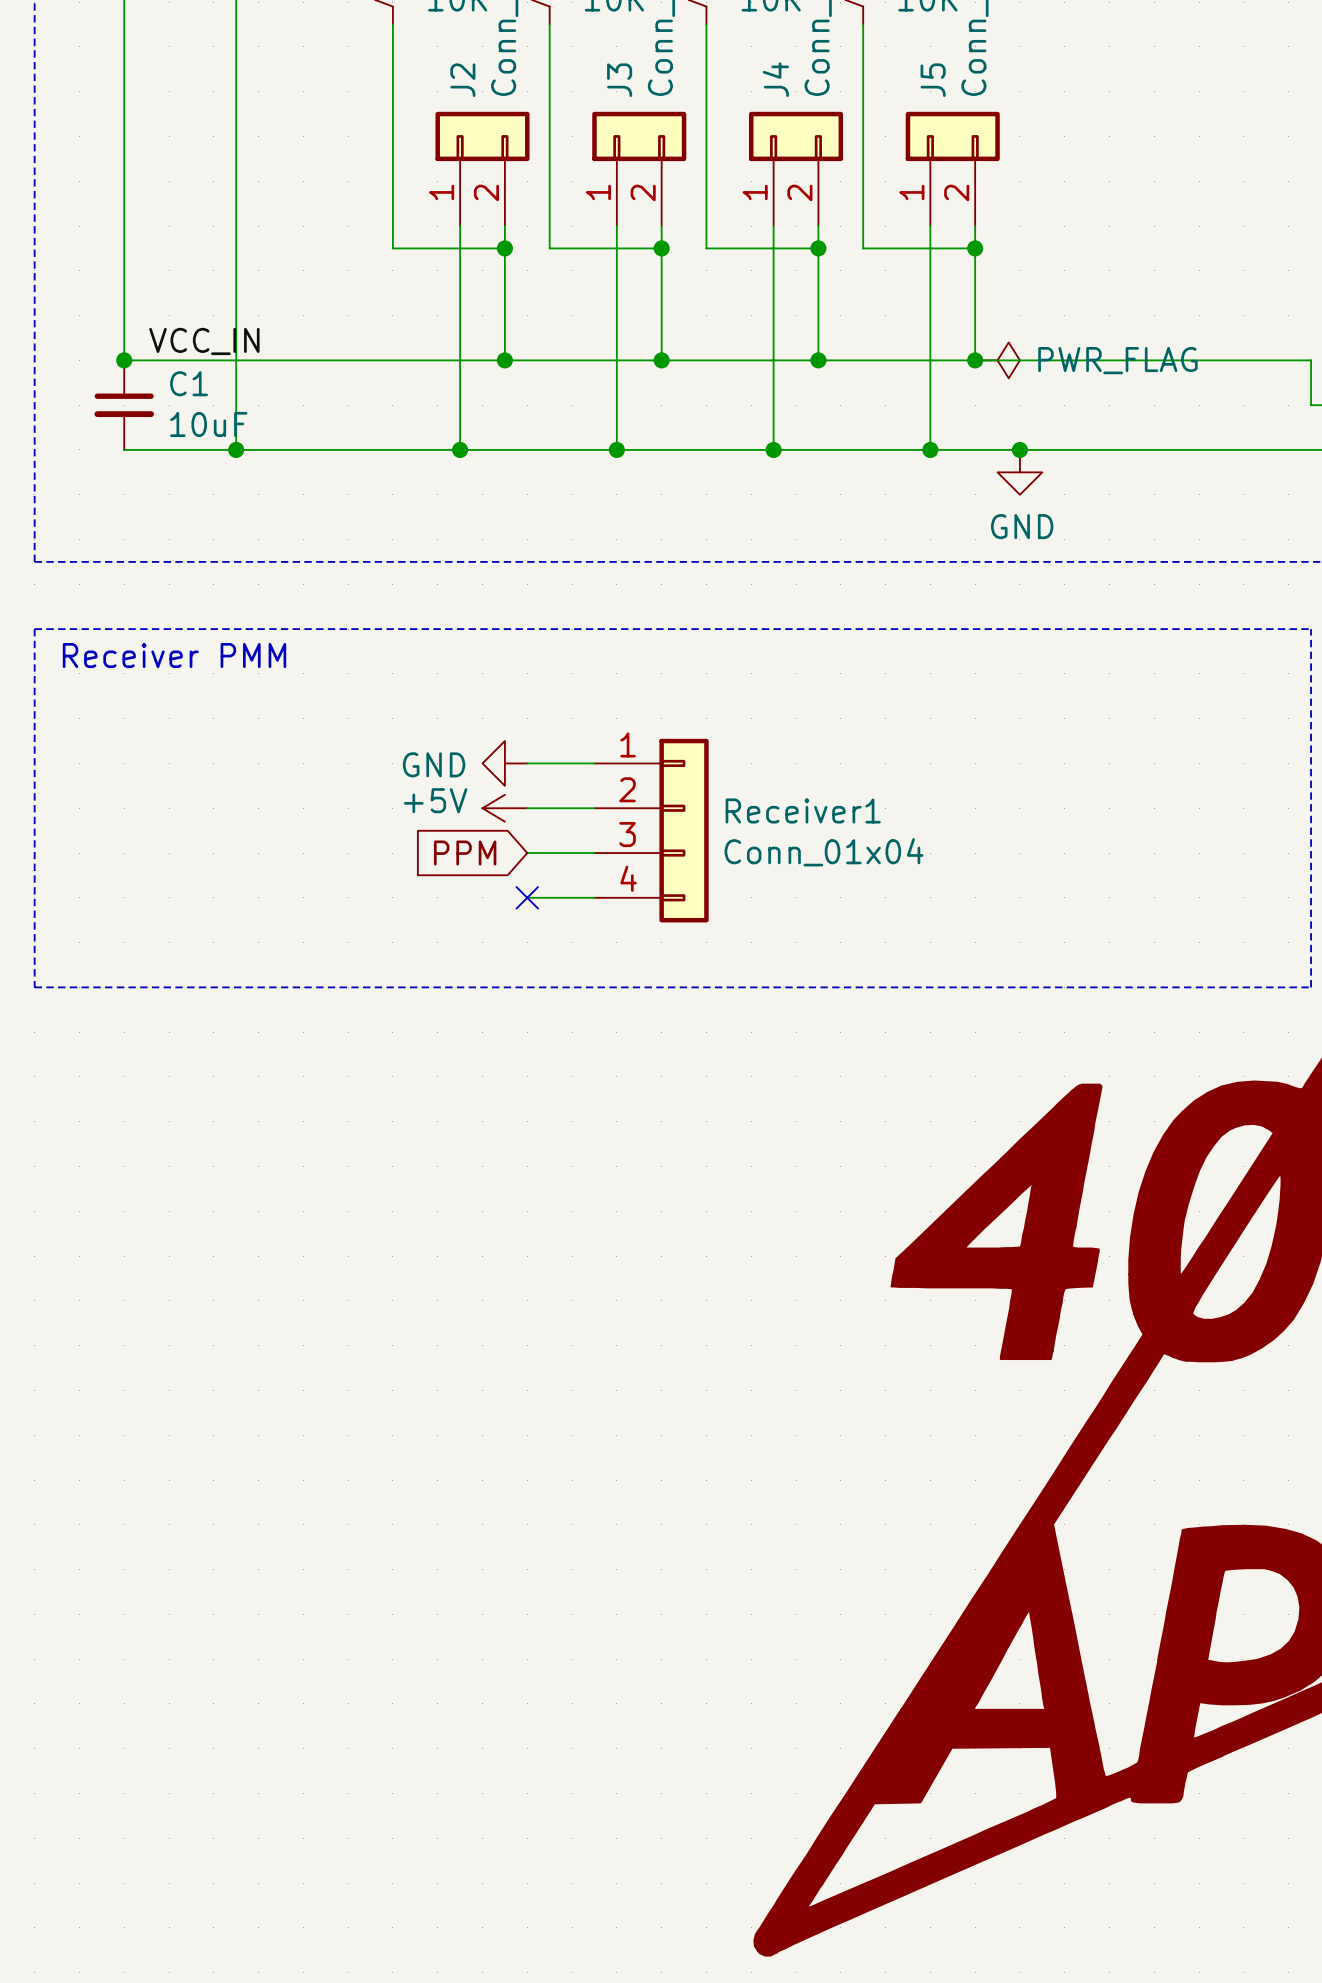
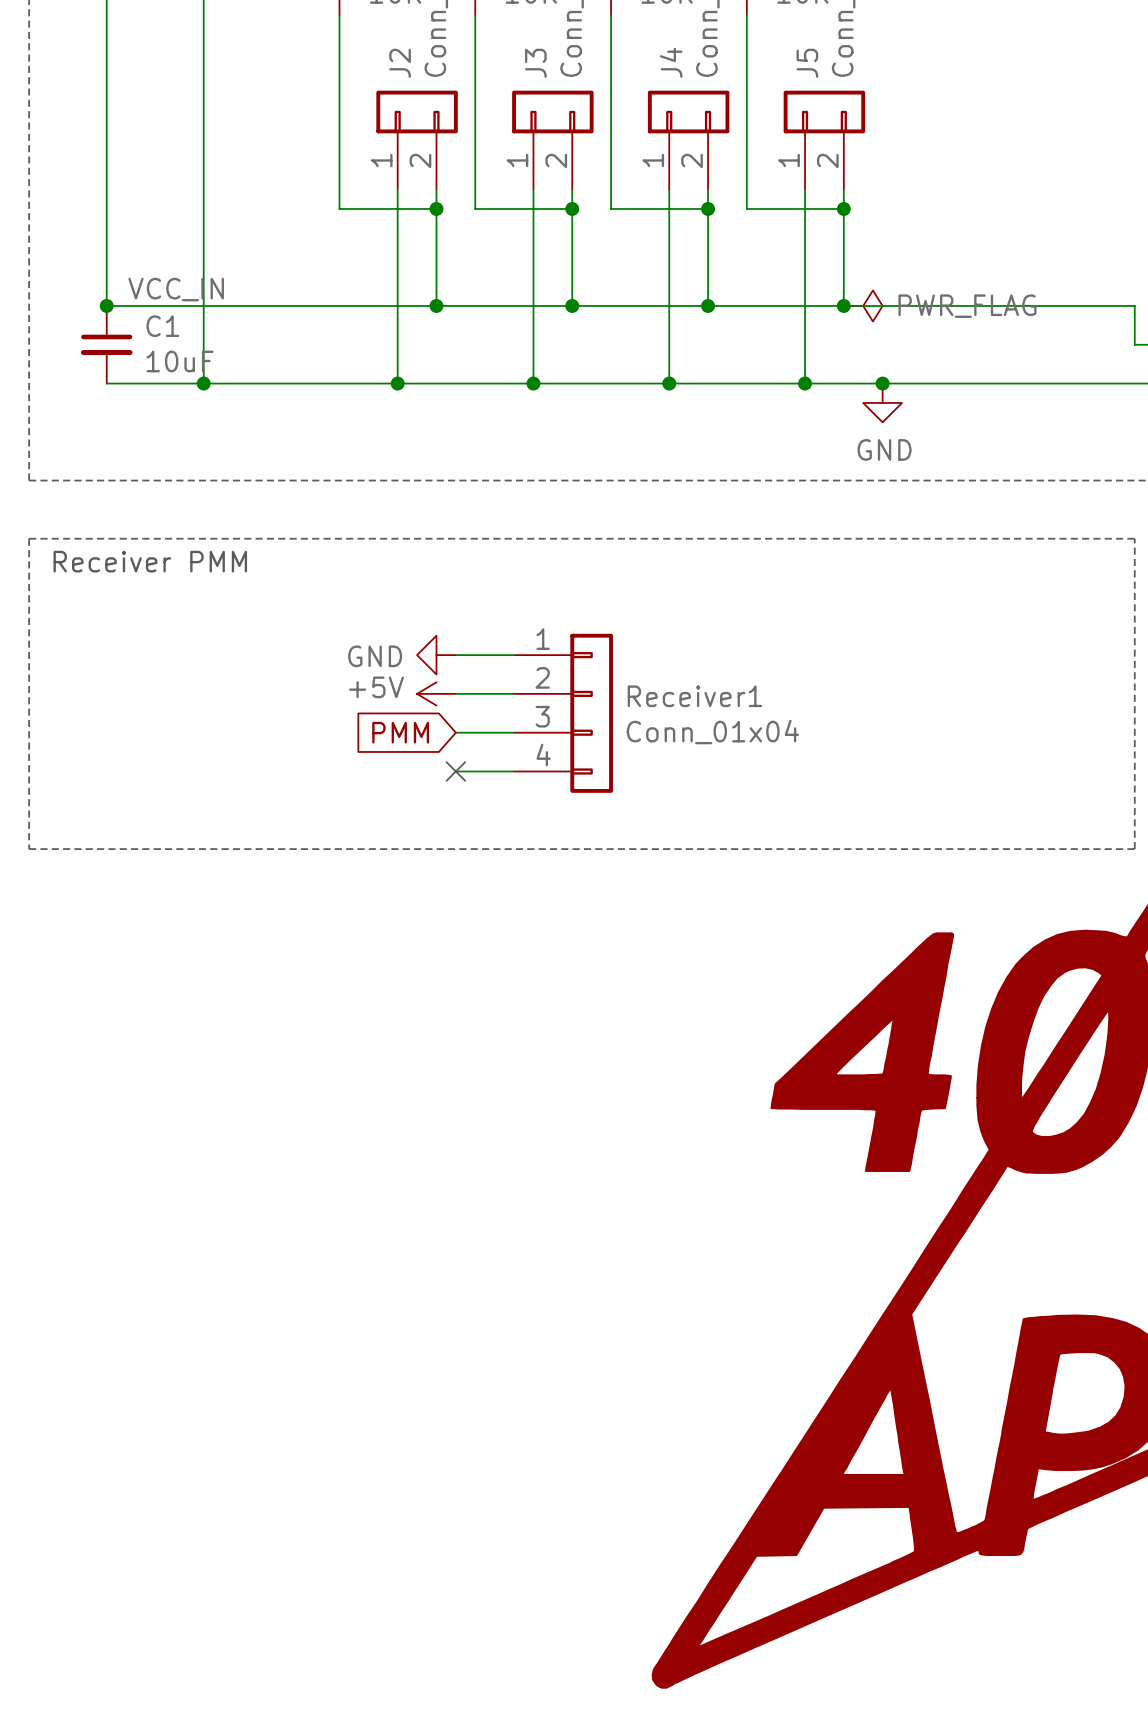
global label: PPM (465, 853) -> PMM (400, 732)

